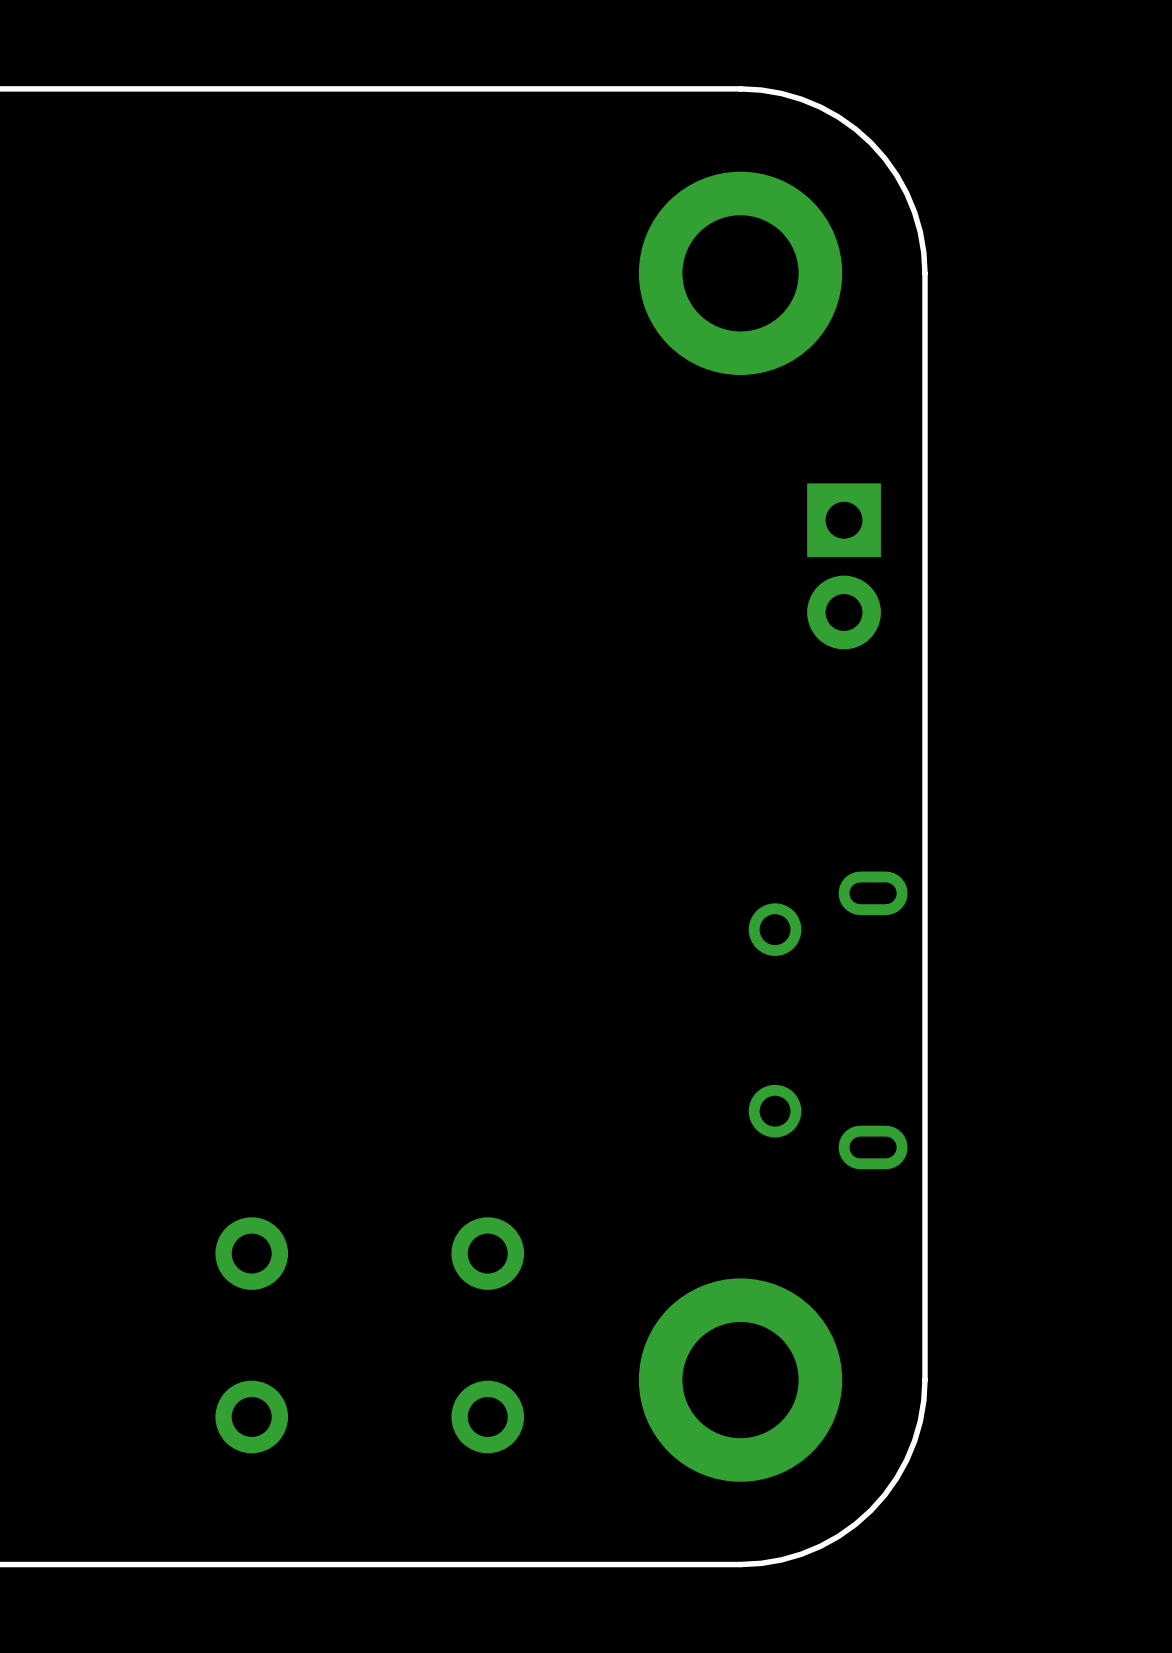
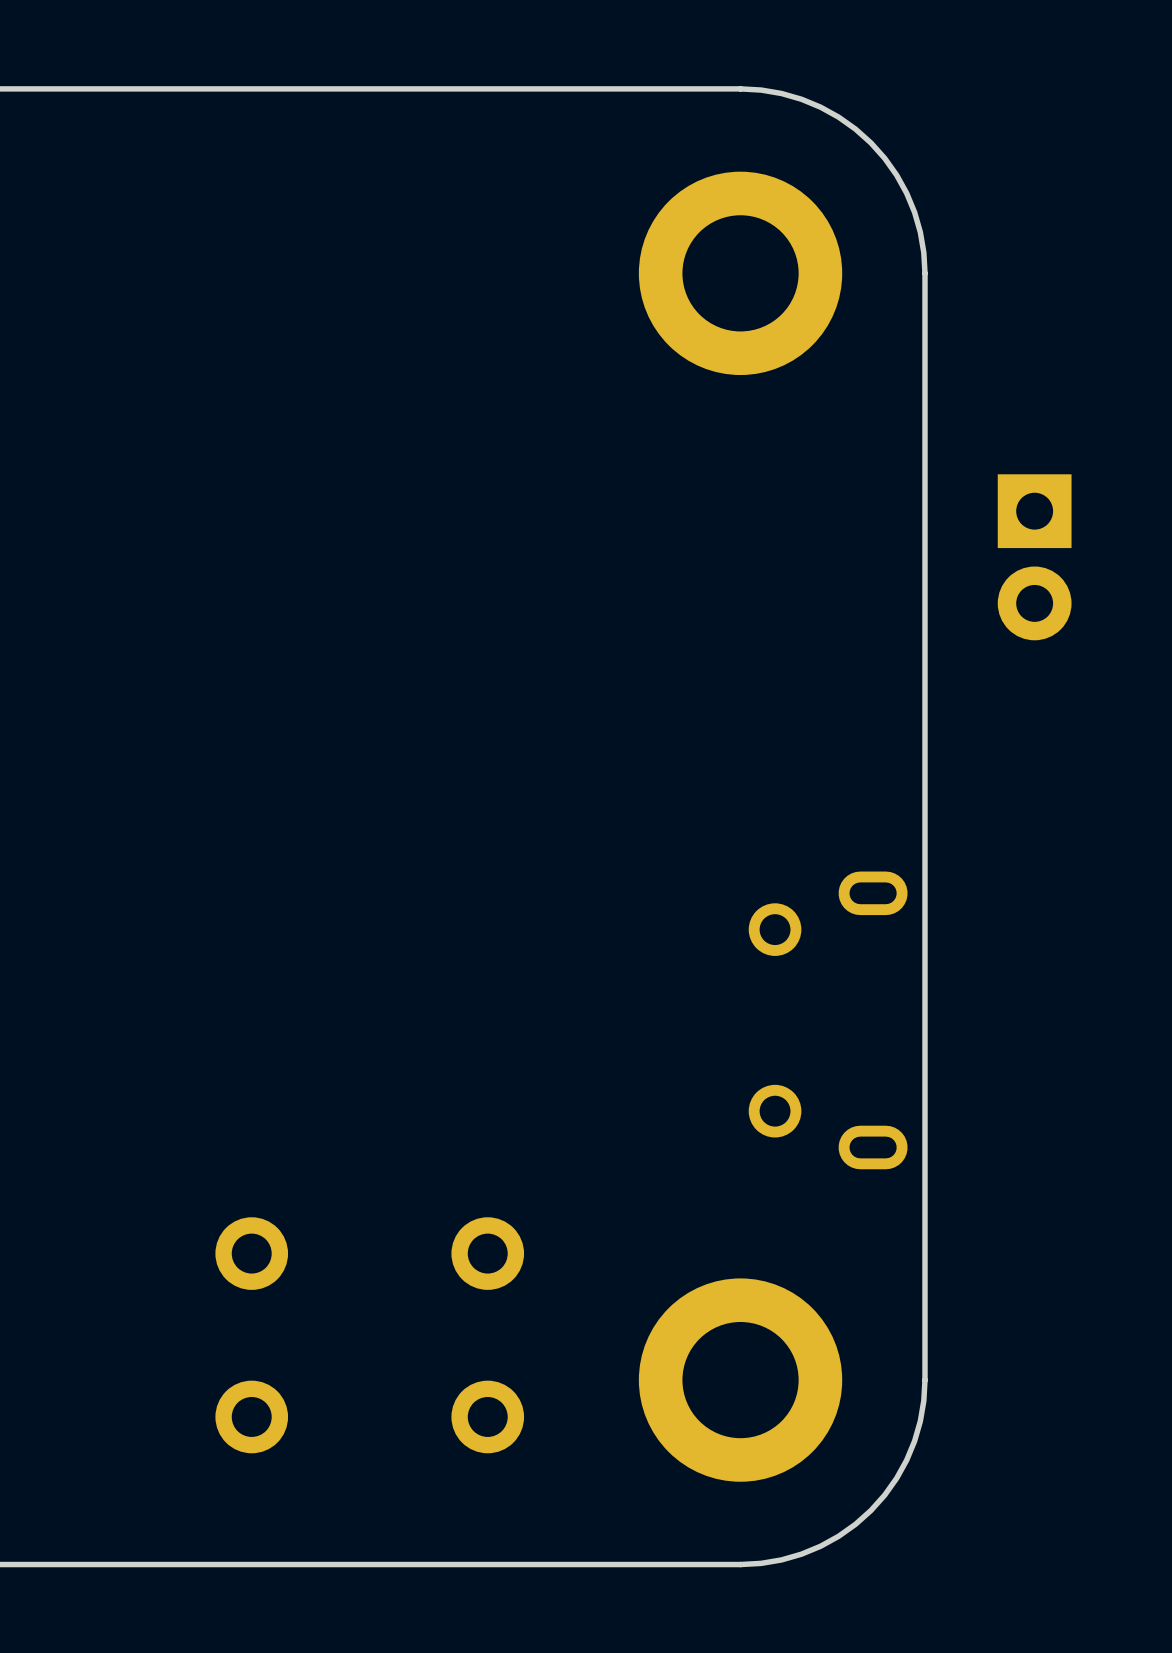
part position: (844, 566) -> (1034, 557)

